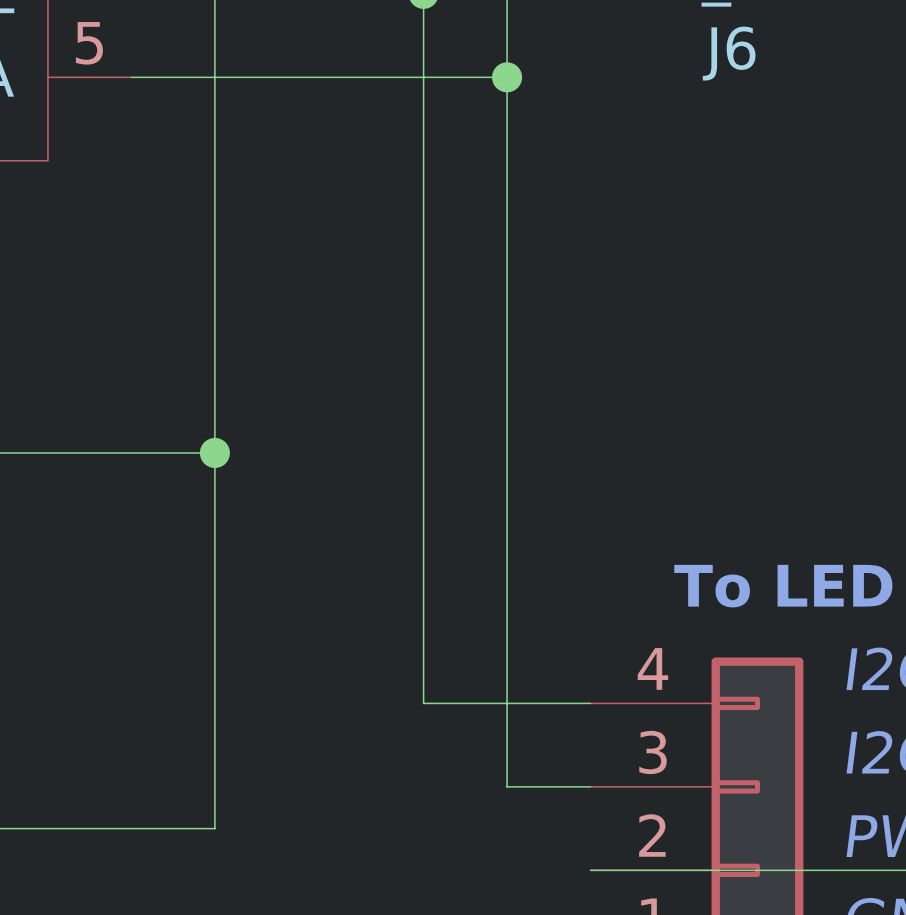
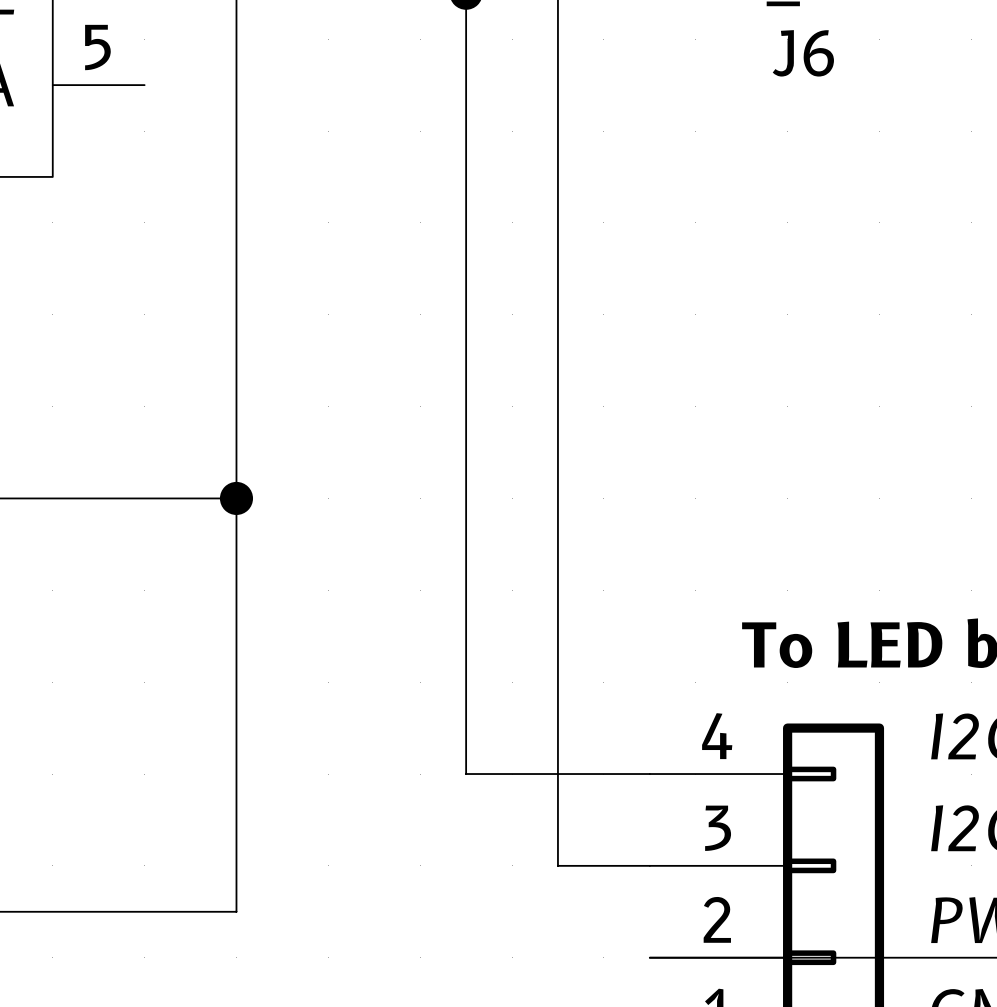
wire: (131, 77) (507, 77) -> none
junction: (507, 77) -> none

